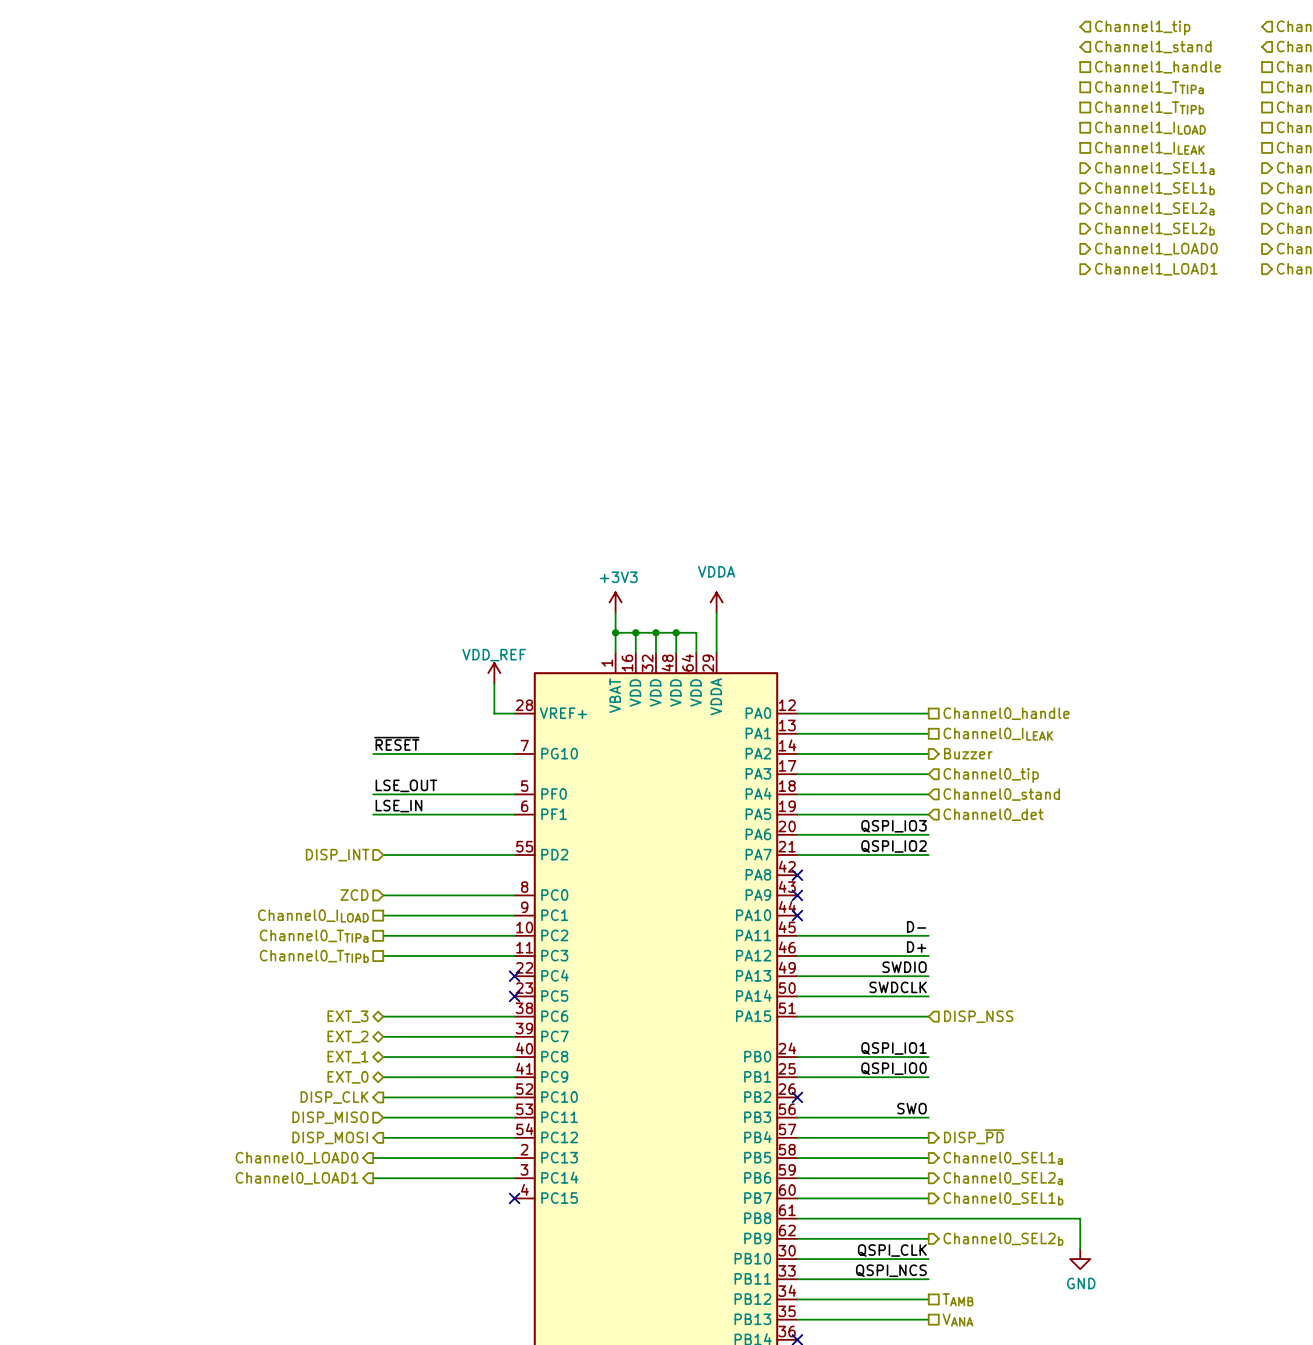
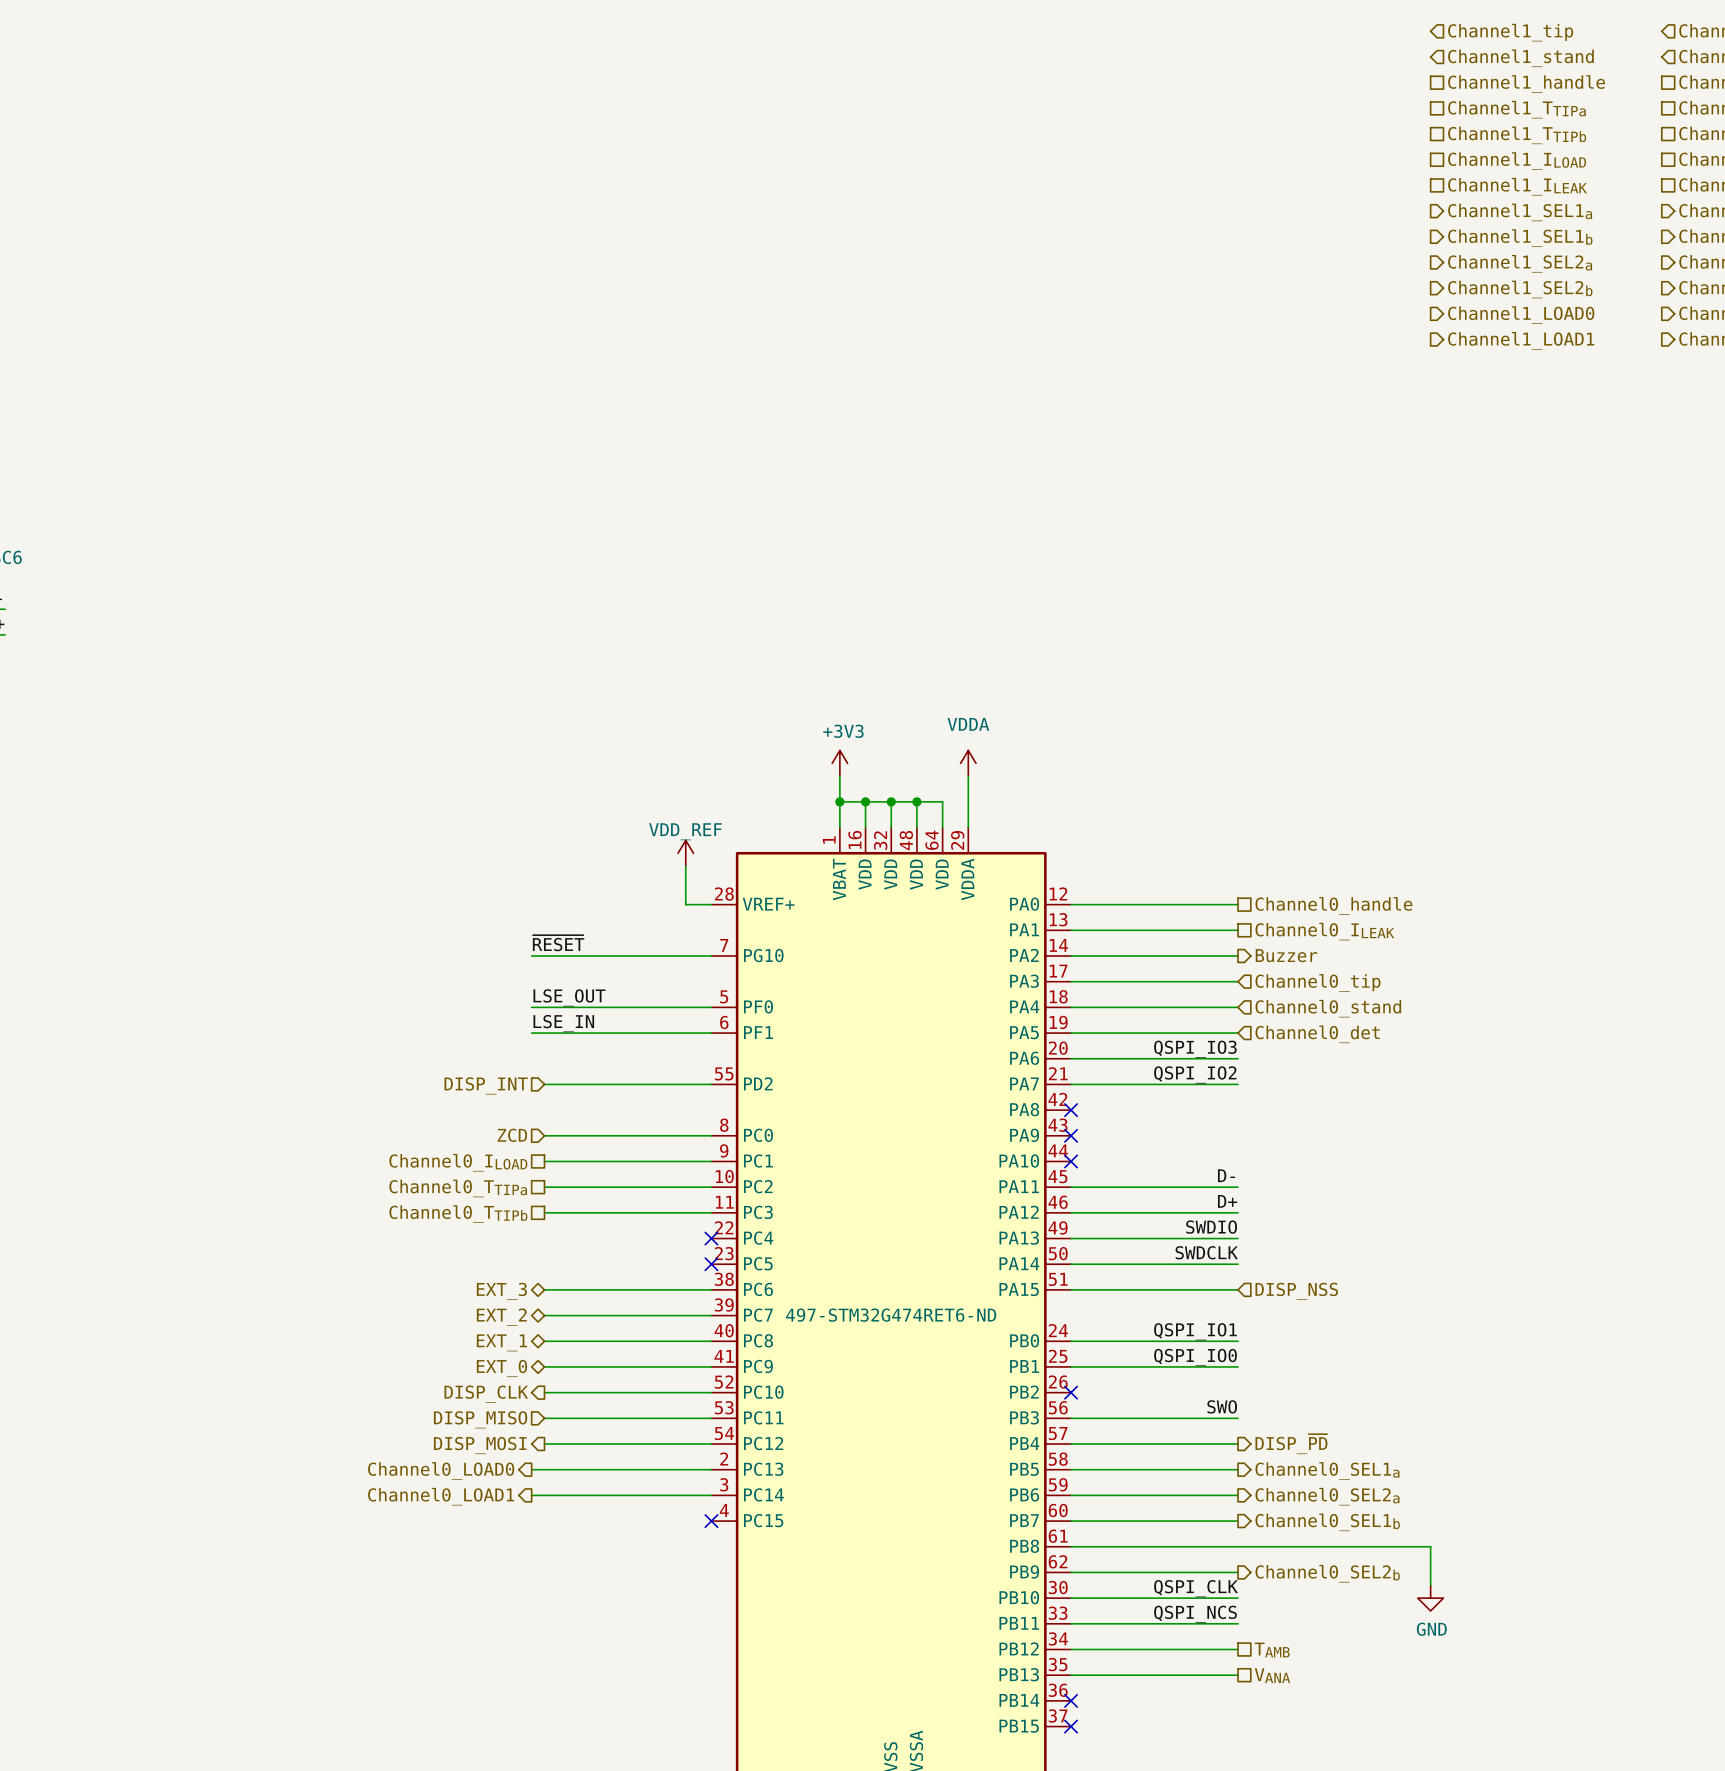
part text: none -> 497-STM32G474RET6-ND (891, 1315)

